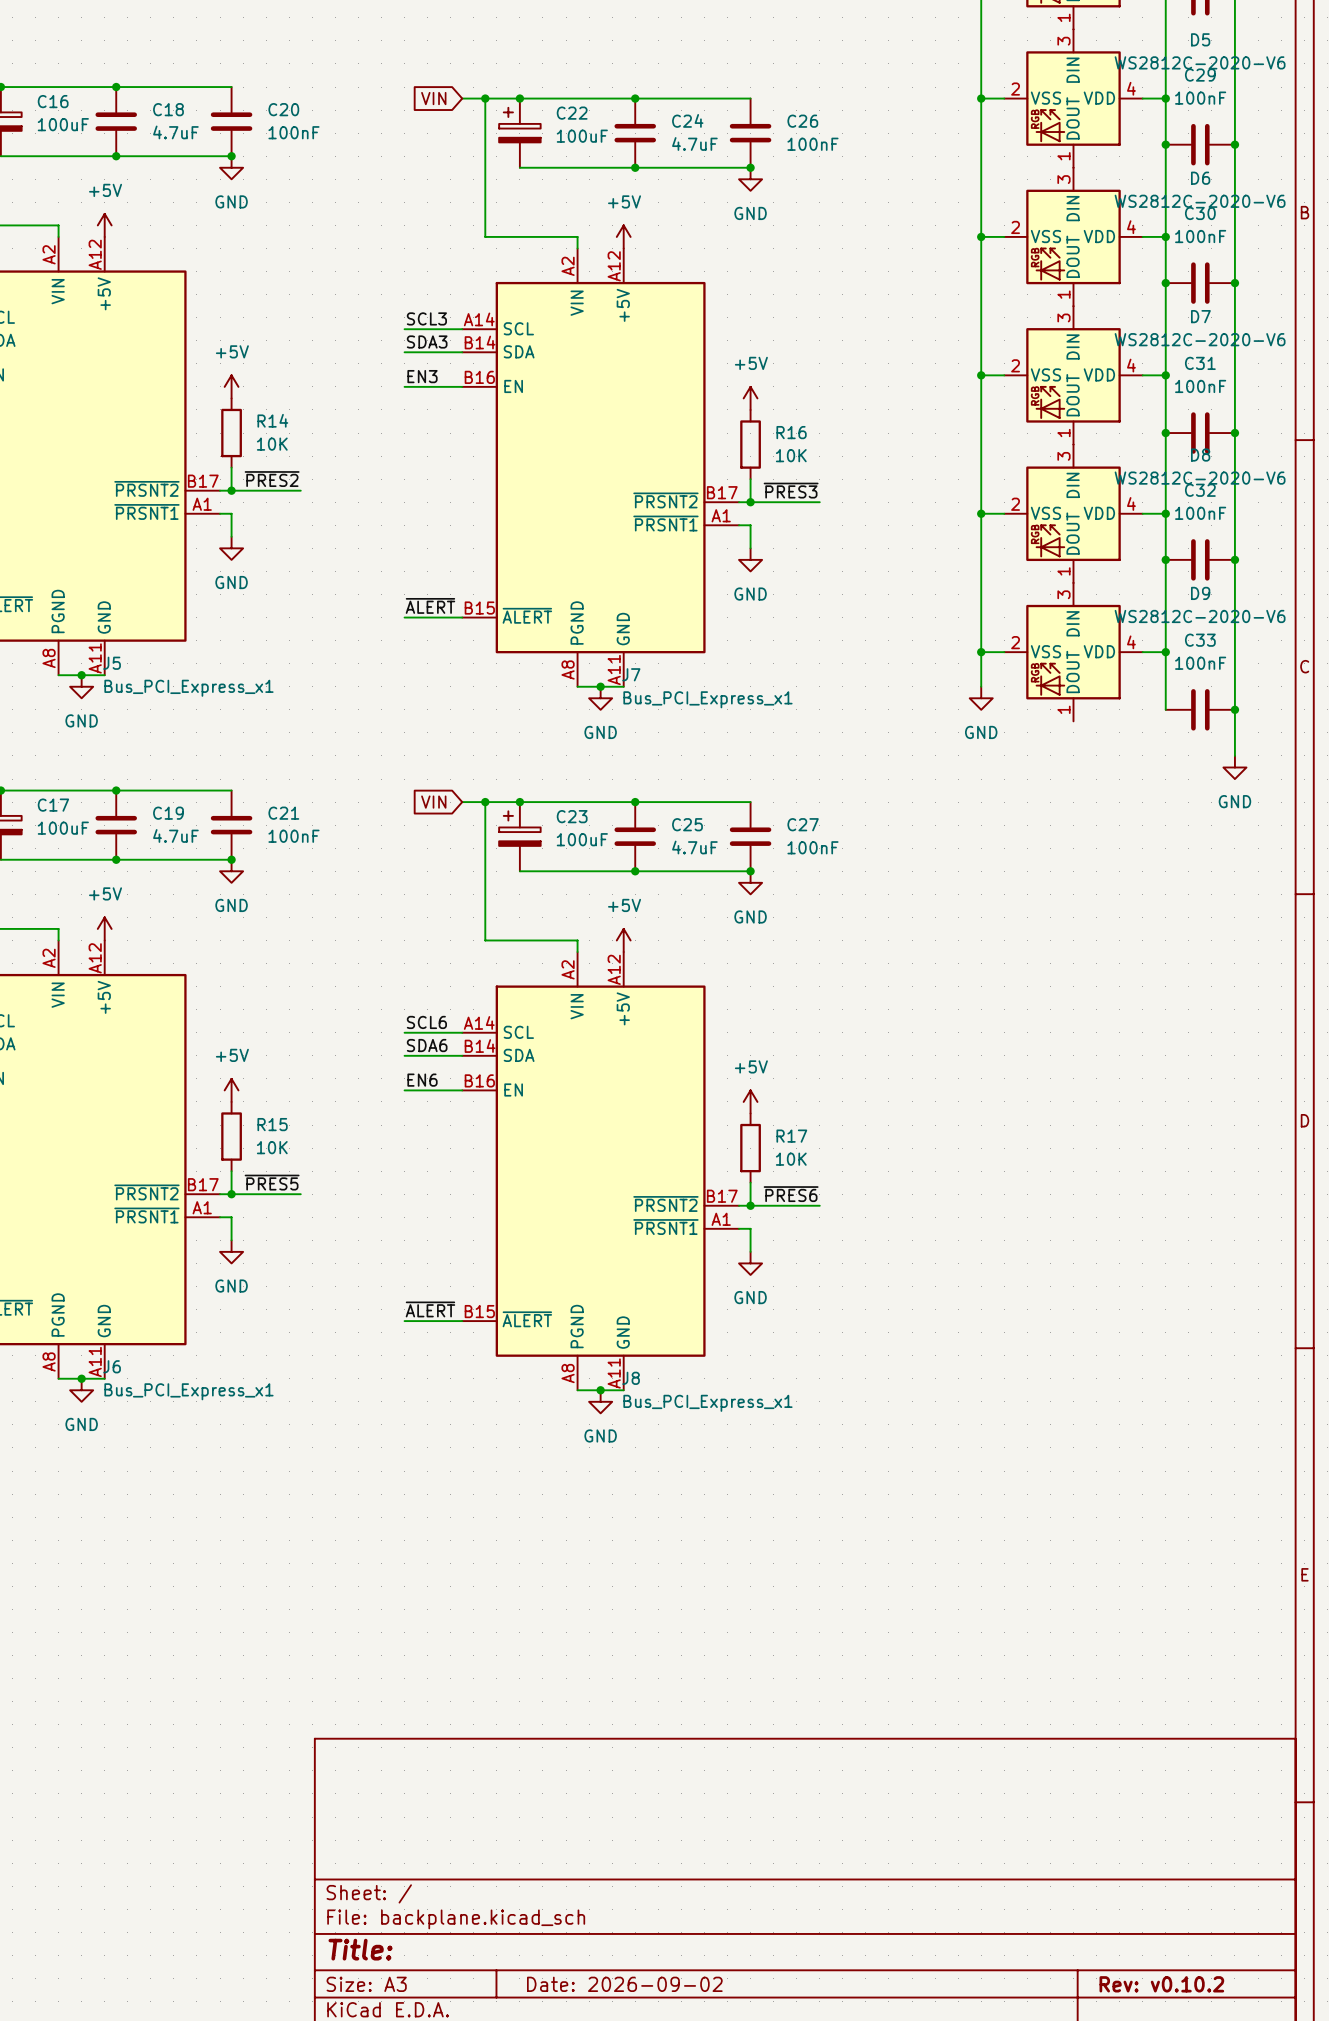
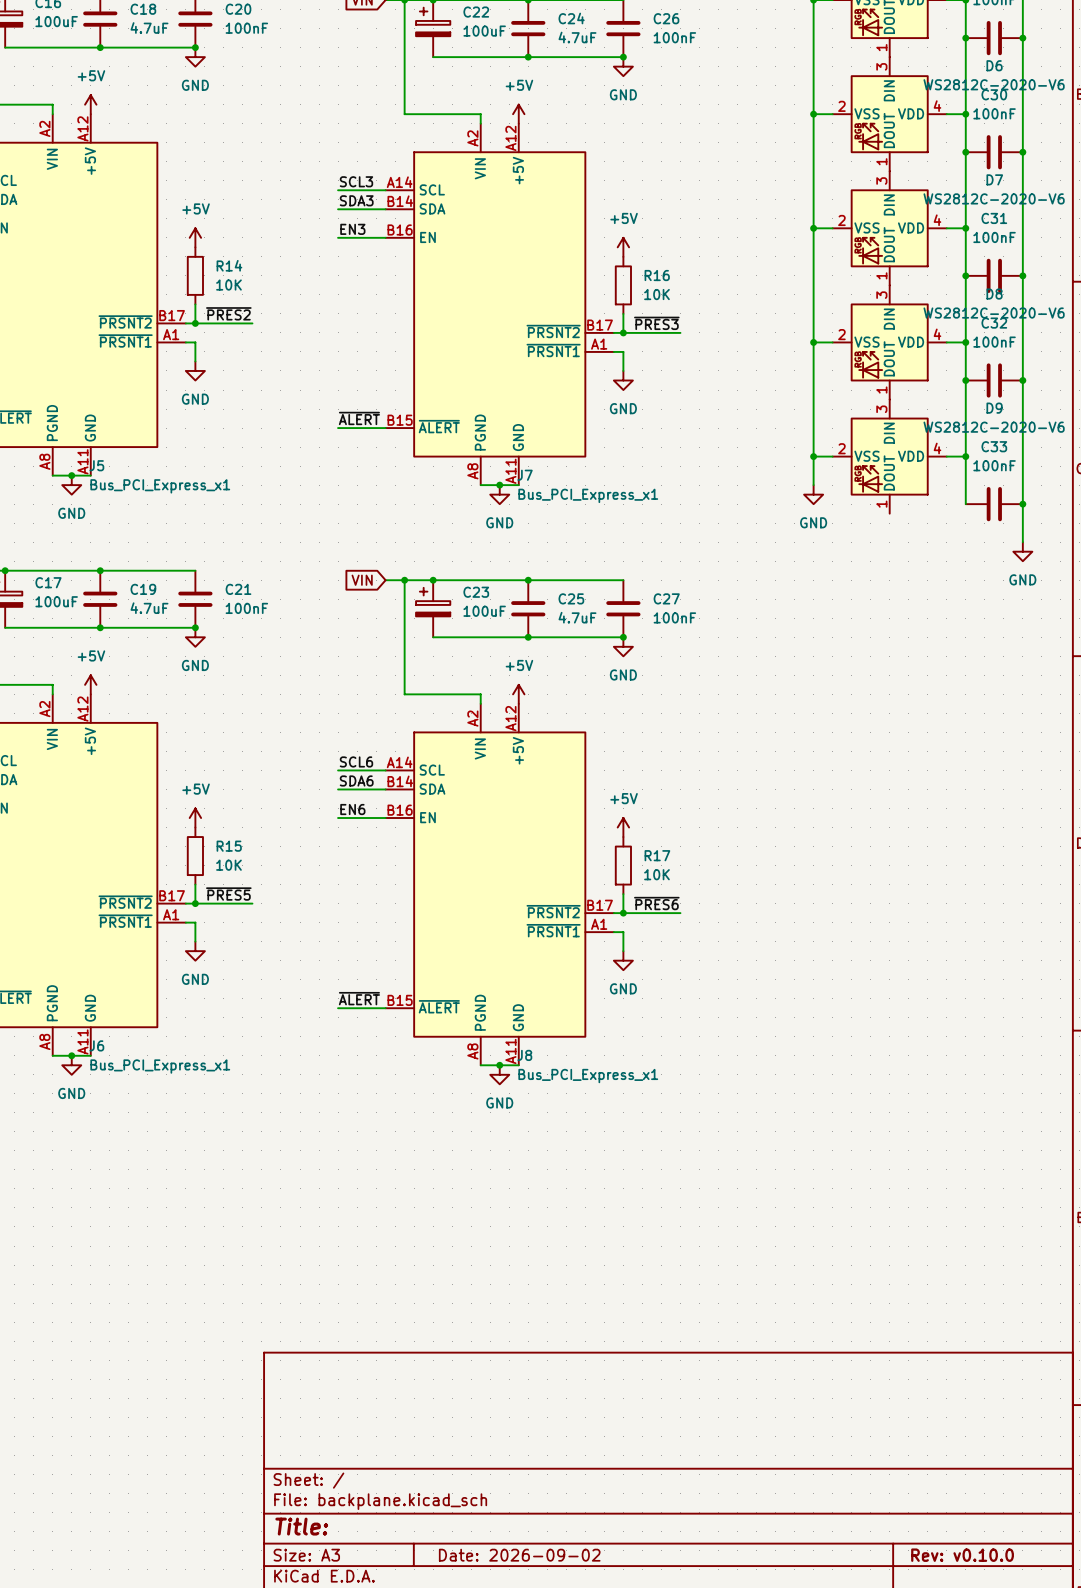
title block: Rev: v0.10.2 (1161, 1984) -> Rev: v0.10.0 (962, 1555)

